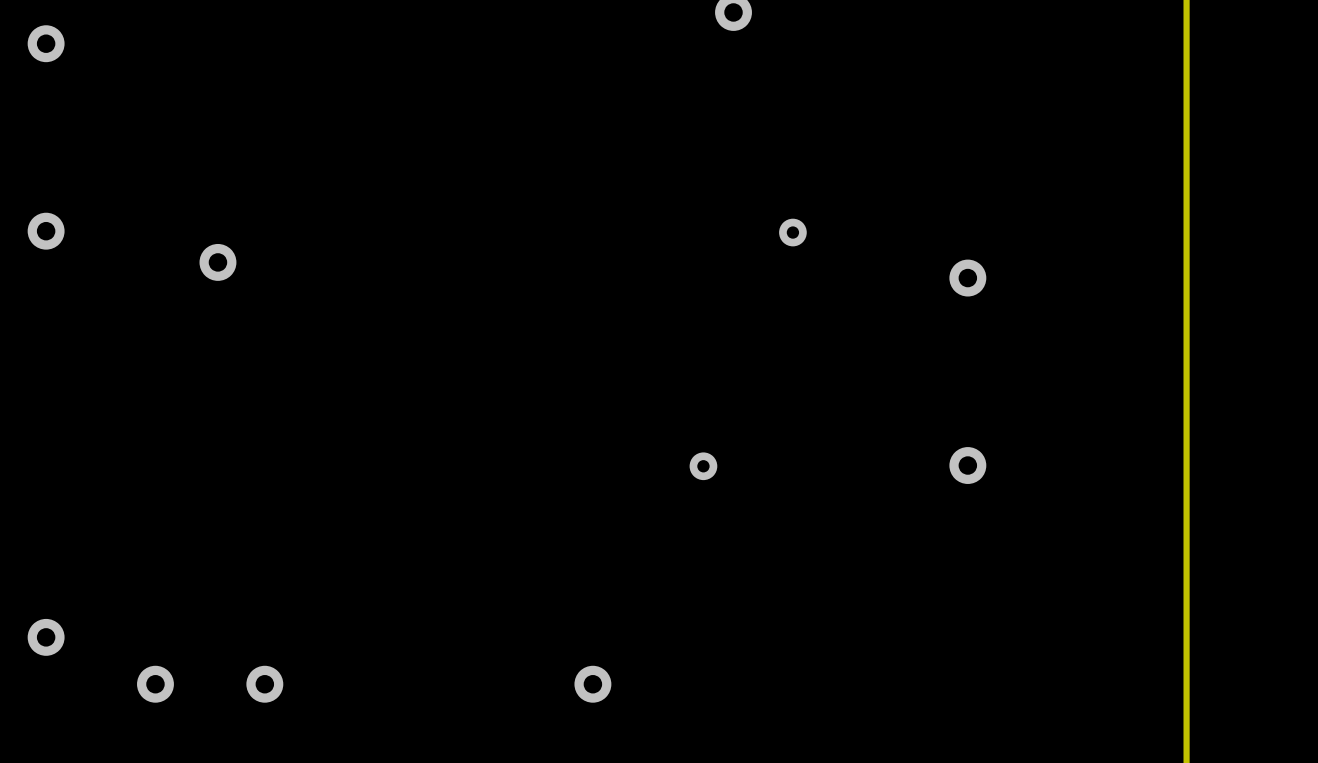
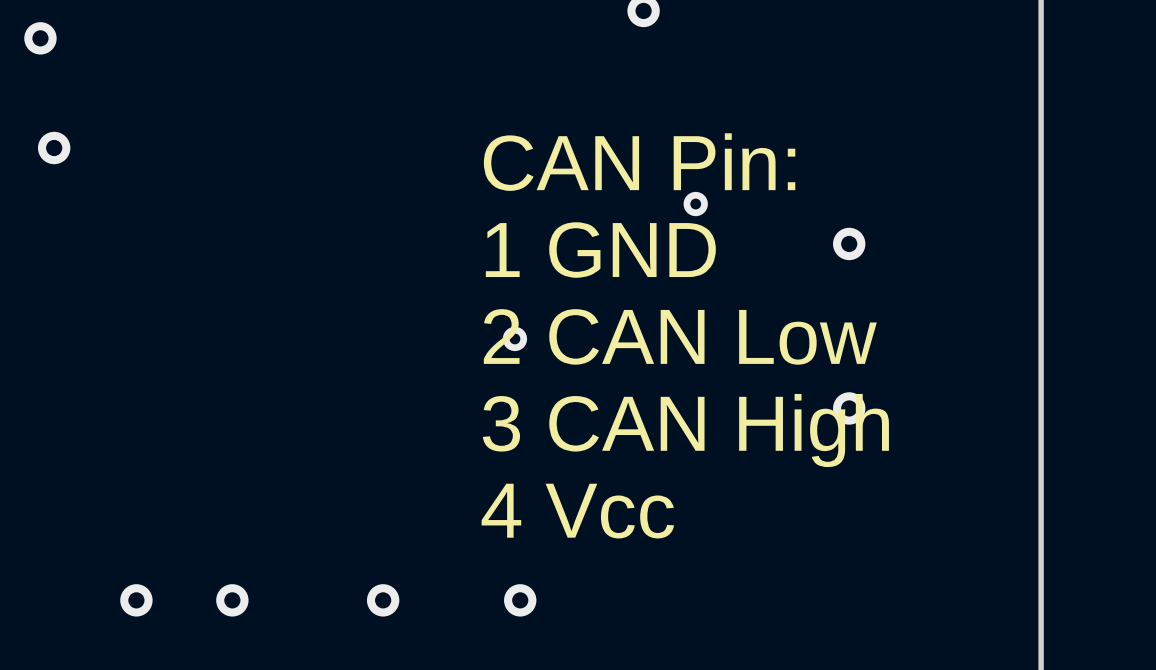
text: none -> CAN Pin: (639, 162)
via position: (46, 231) -> (54, 148)
via: (217, 262) -> none
text: none -> 1 GND (600, 250)
text: none -> 2 CAN Low (680, 336)
via position: (703, 466) -> (514, 338)
text: none -> 3 CAN High (685, 430)
text: none -> 4 Vcc (577, 511)
via: (46, 637) -> none
via: none -> (383, 600)

